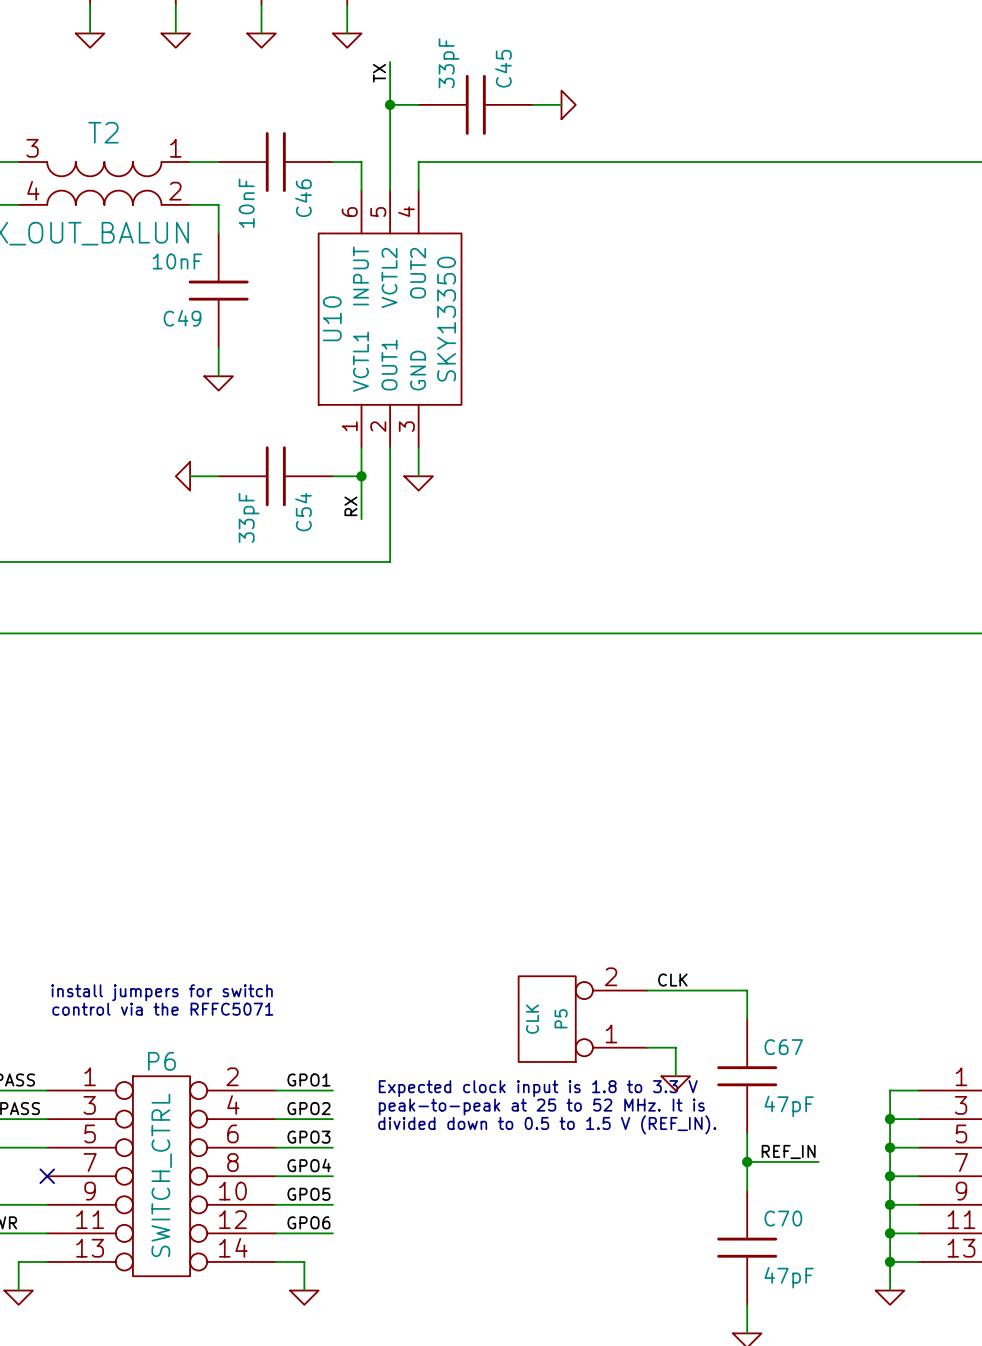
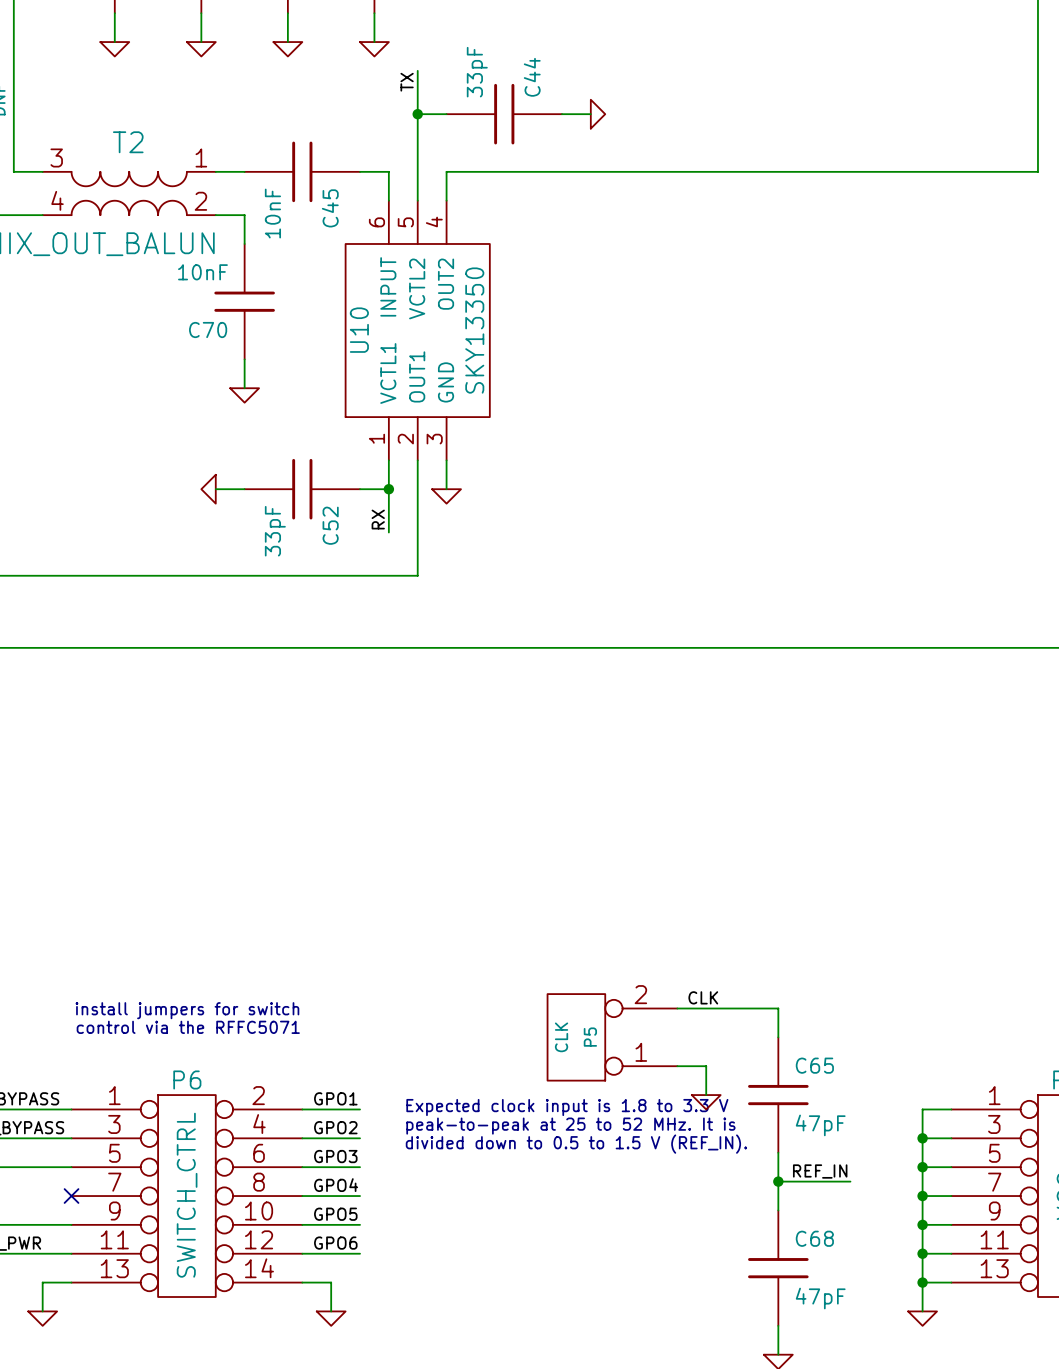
C45 name: C45 (503, 68) -> C44 (532, 77)
C46 name: C46 (303, 198) -> C45 (330, 208)
C49 name: C49 (182, 318) -> C70 (208, 330)
C54 name: C54 (303, 512) -> C52 (330, 525)
C67 name: C67 (783, 1047) -> C65 (814, 1065)
C70 name: C70 (783, 1218) -> C68 (814, 1238)

